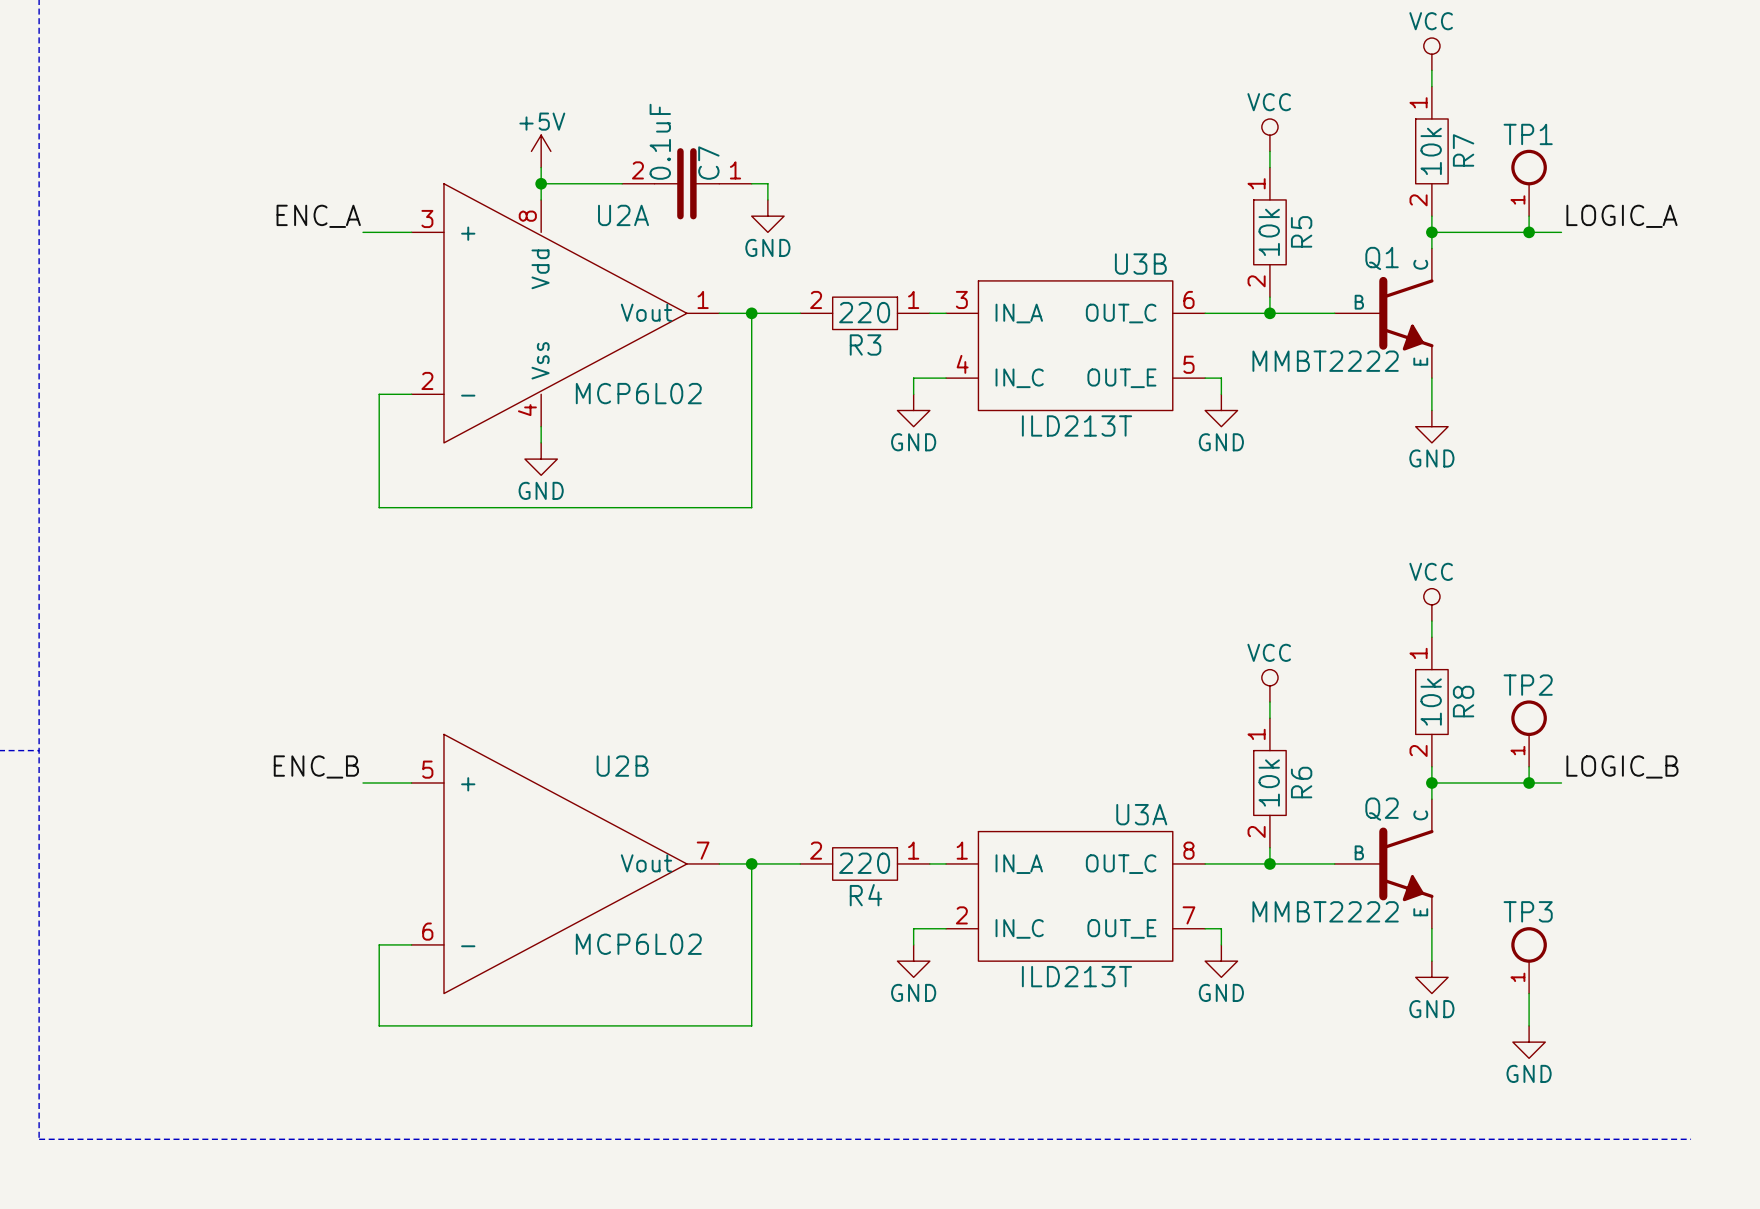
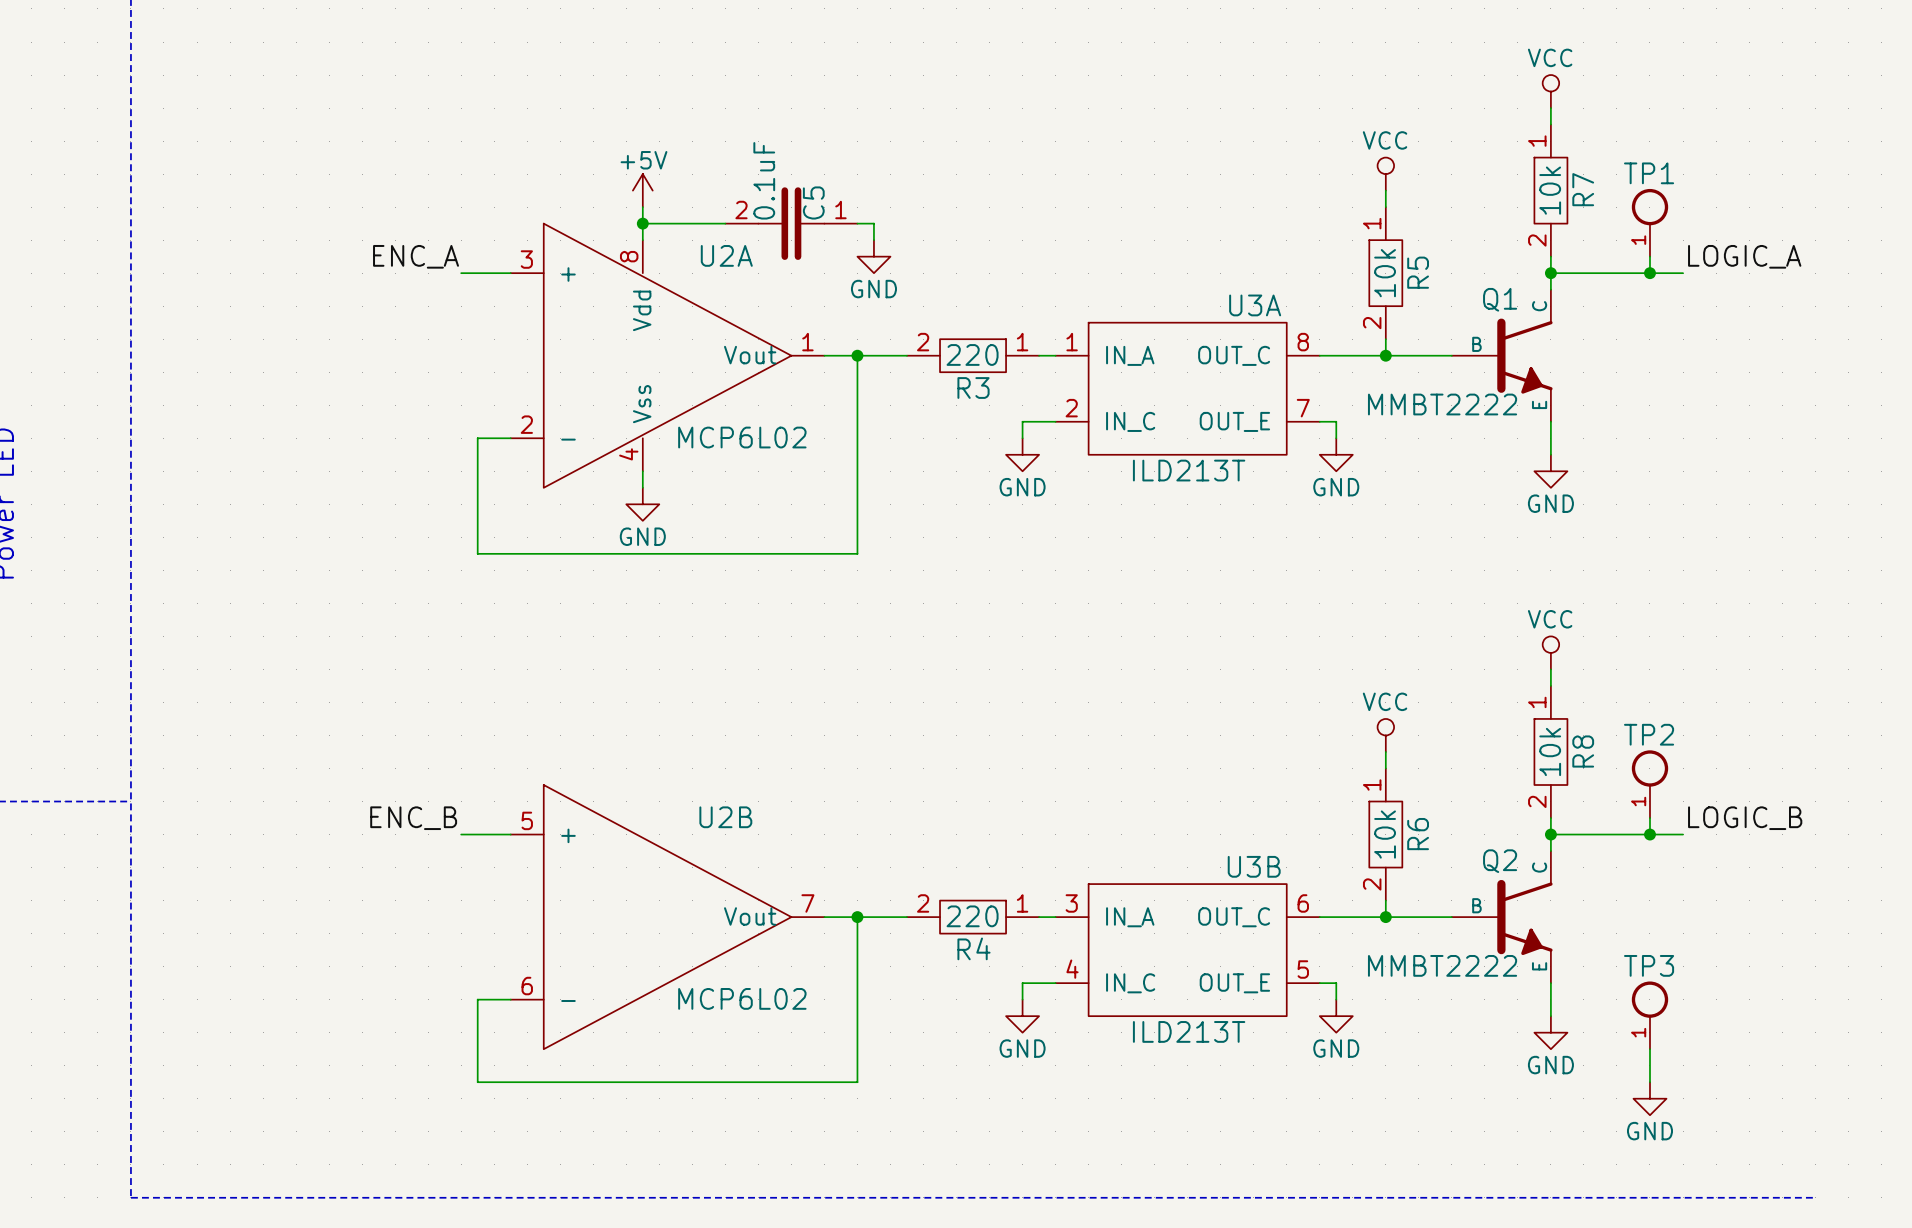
C7 name: C7 (708, 163) -> C5 (813, 202)
U3B position: (1075, 345) -> (1187, 950)
U3A position: (1075, 896) -> (1187, 388)

